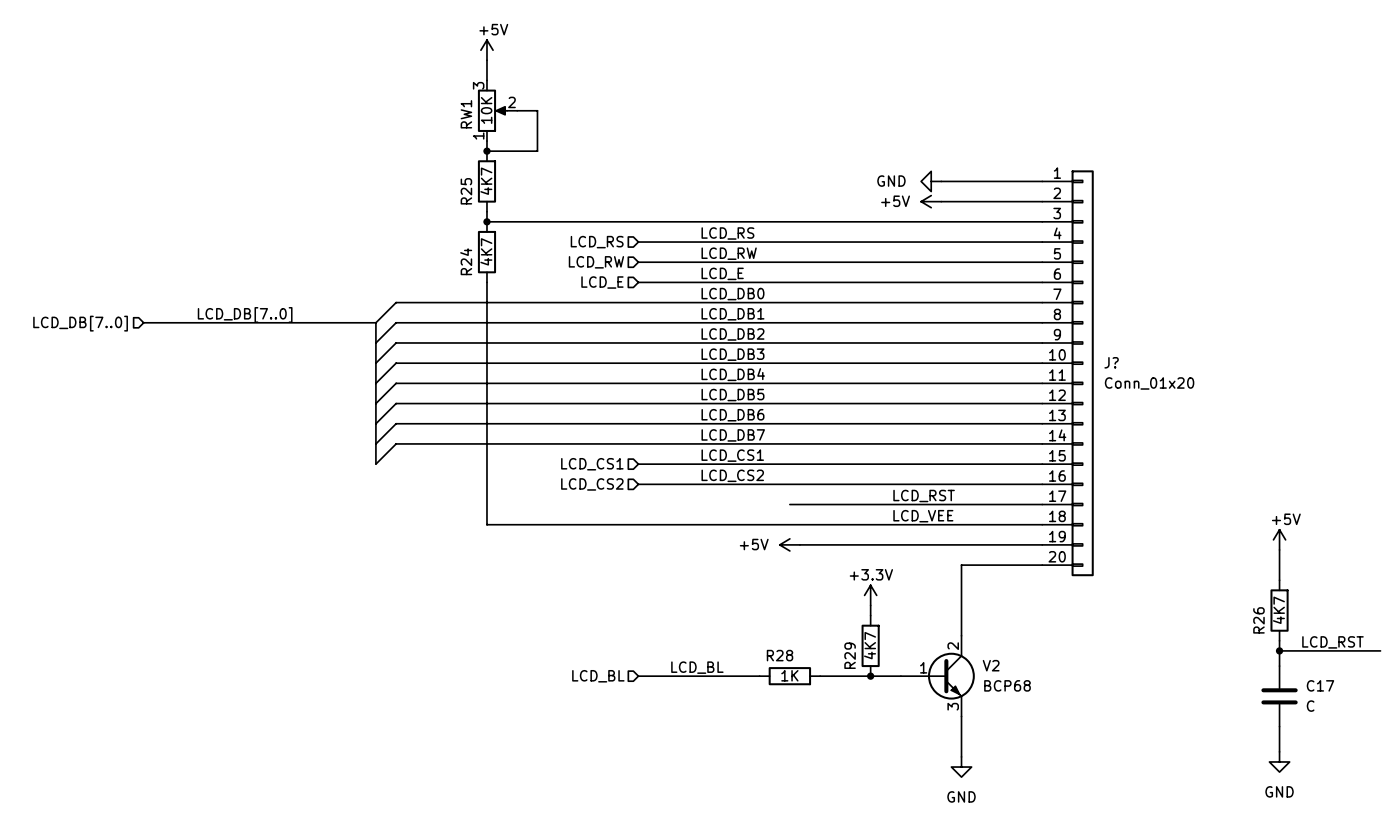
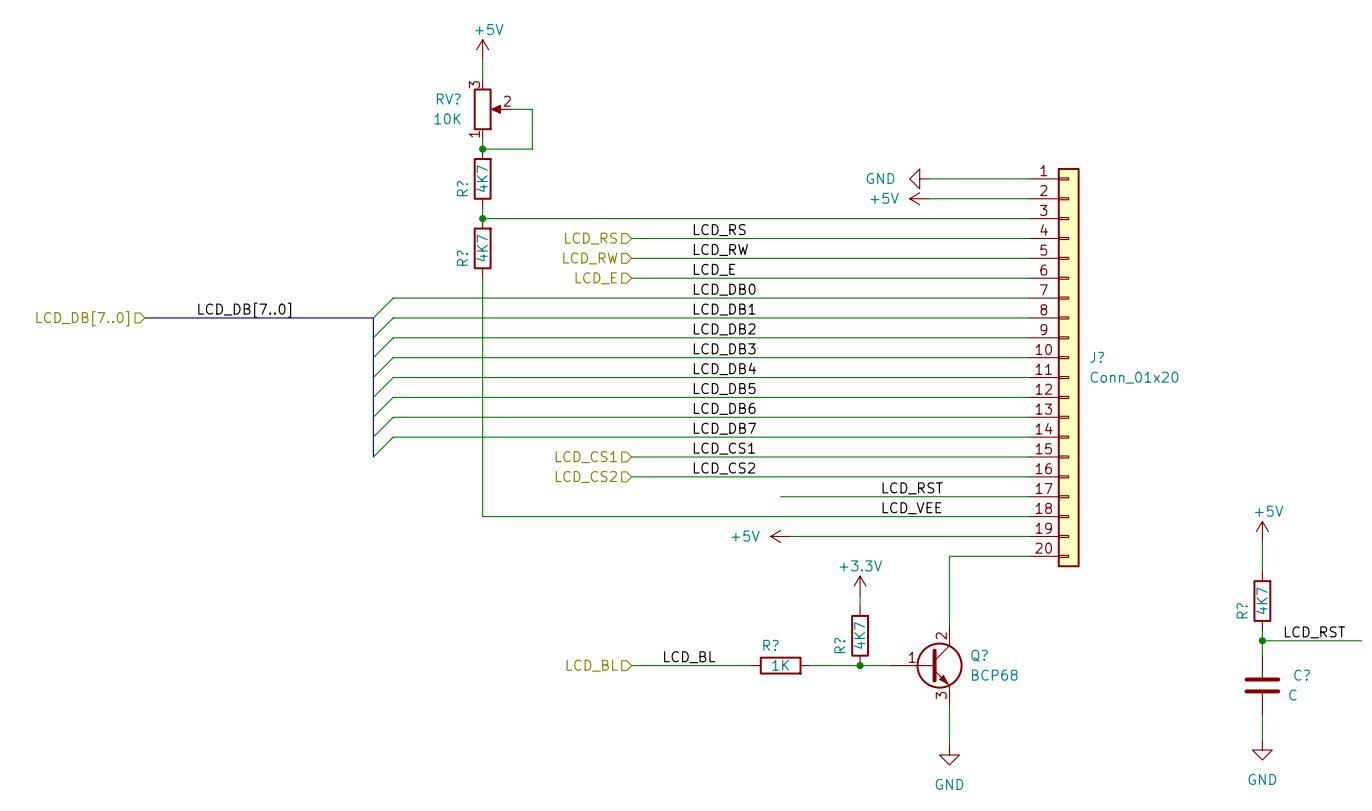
RW1 value rotation: 0° (486, 110) -> 90° clockwise (447, 118)
RW1 value position: 10K (486, 110) -> 10K (447, 118)
RW1 name: RW1 (466, 114) -> RV? (448, 99)
R25 name: R25 (466, 191) -> R? (462, 188)
R24 name: R24 (466, 261) -> R? (462, 258)
R26 name: R26 (1258, 620) -> R? (1242, 610)
R28 name: R28 (780, 655) -> R? (770, 645)
R29 name: R29 (850, 655) -> R? (839, 645)
V2 name: V2 (991, 665) -> Q? (979, 655)
C17 name: C17 (1320, 685) -> C? (1302, 675)

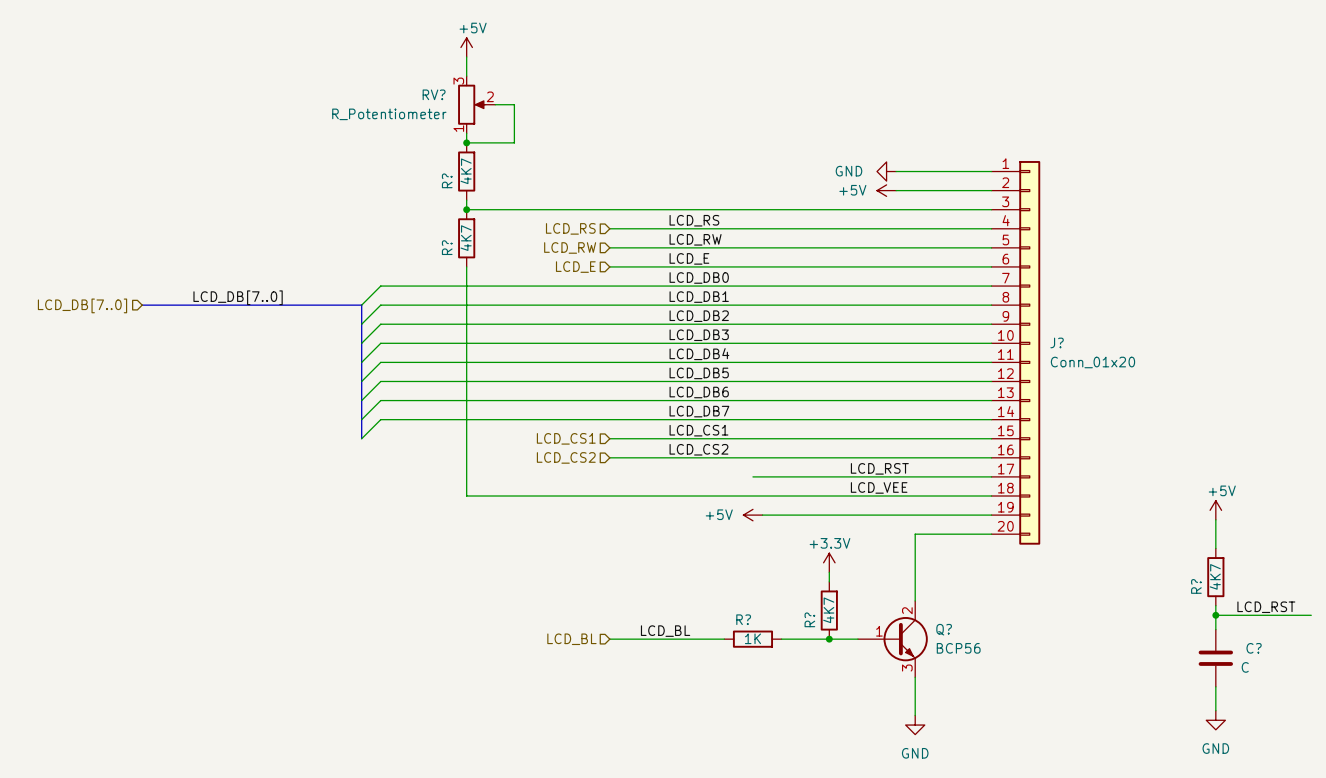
RV? value: 10K (447, 118) -> R_Potentiometer (389, 114)
Q? value: BCP68 (994, 675) -> BCP56 (958, 648)

